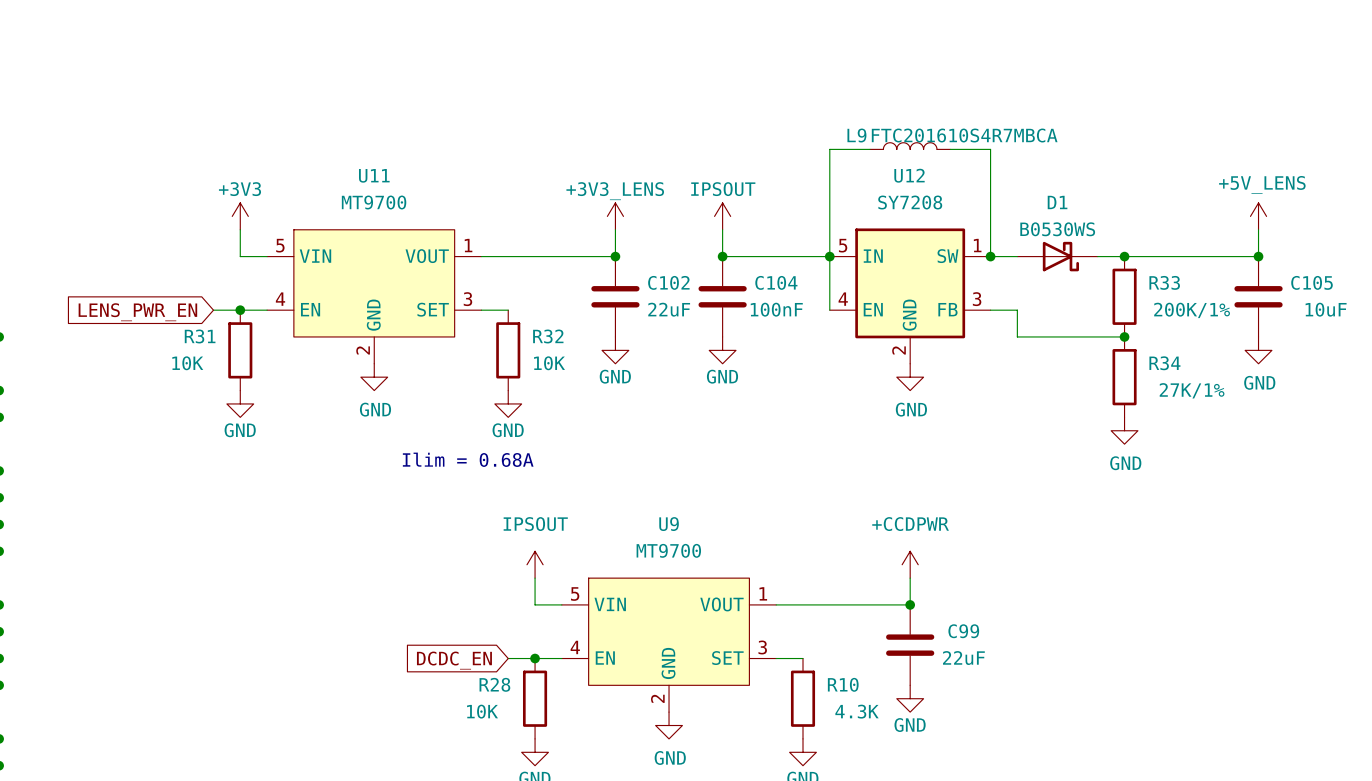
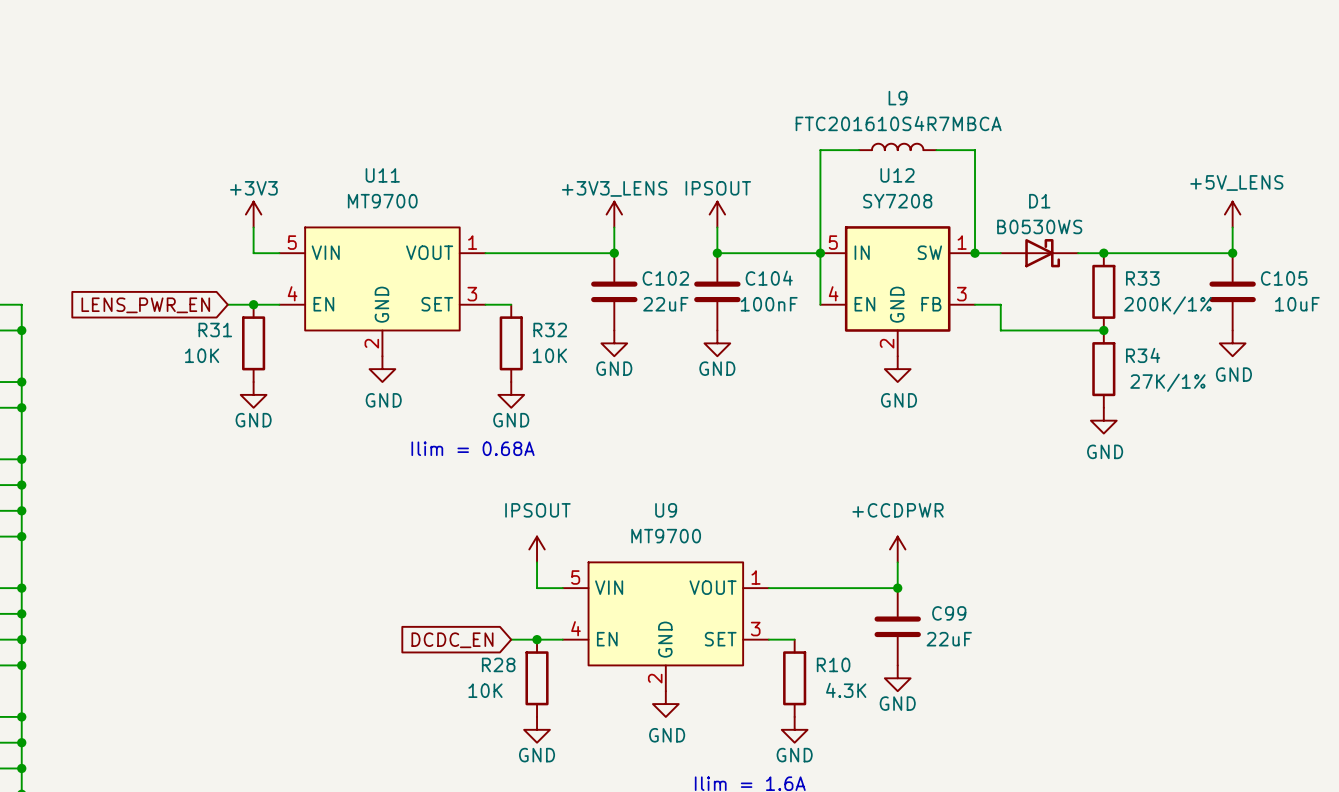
L9 name position: L9 (856, 135) -> L9 (898, 98)
L9 value position: FTC201610S4R7MBCA (964, 135) -> FTC201610S4R7MBCA (898, 123)

